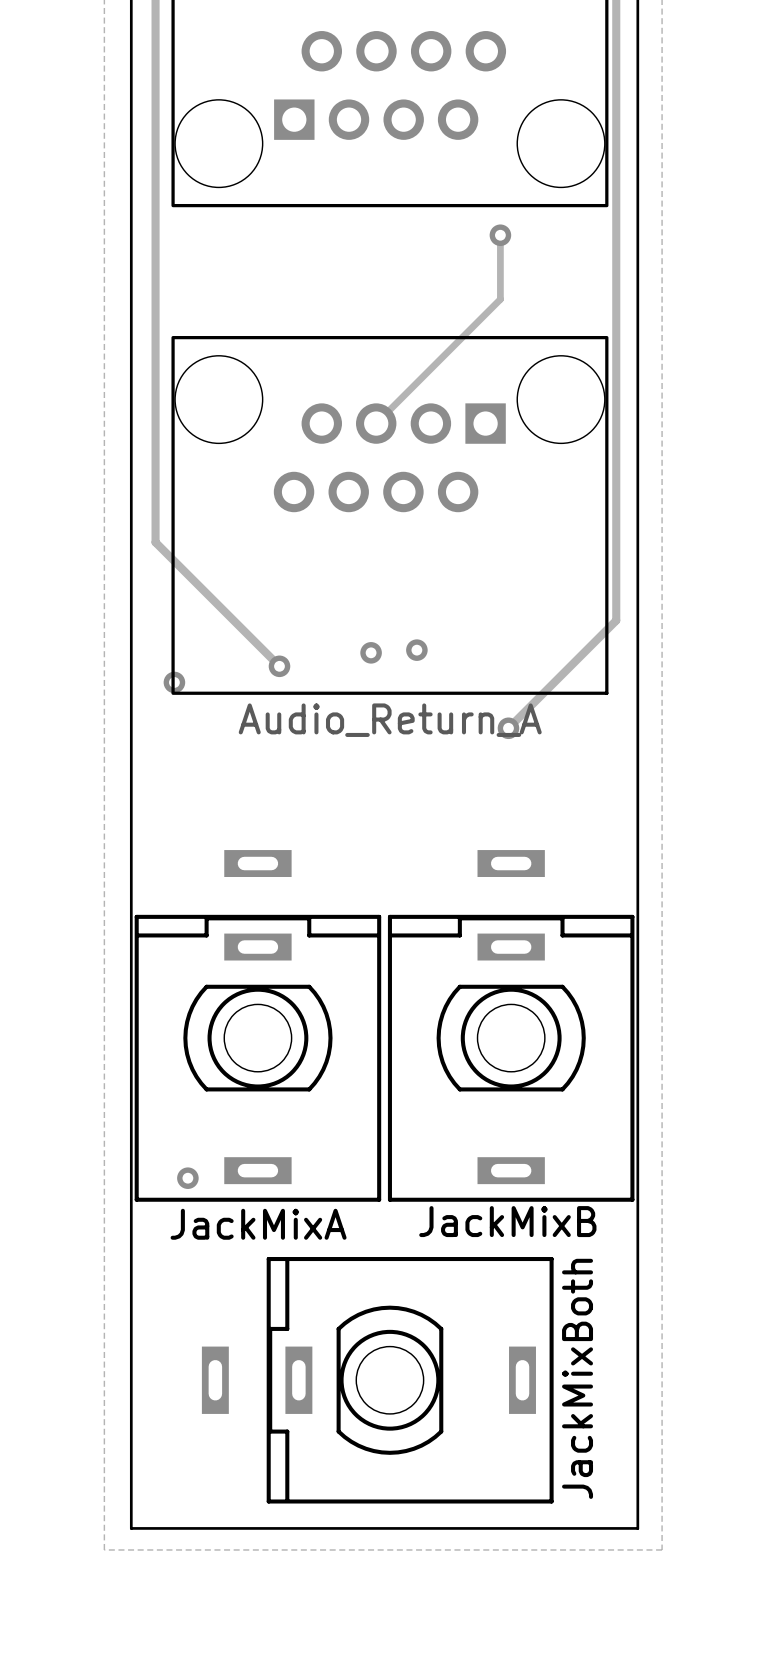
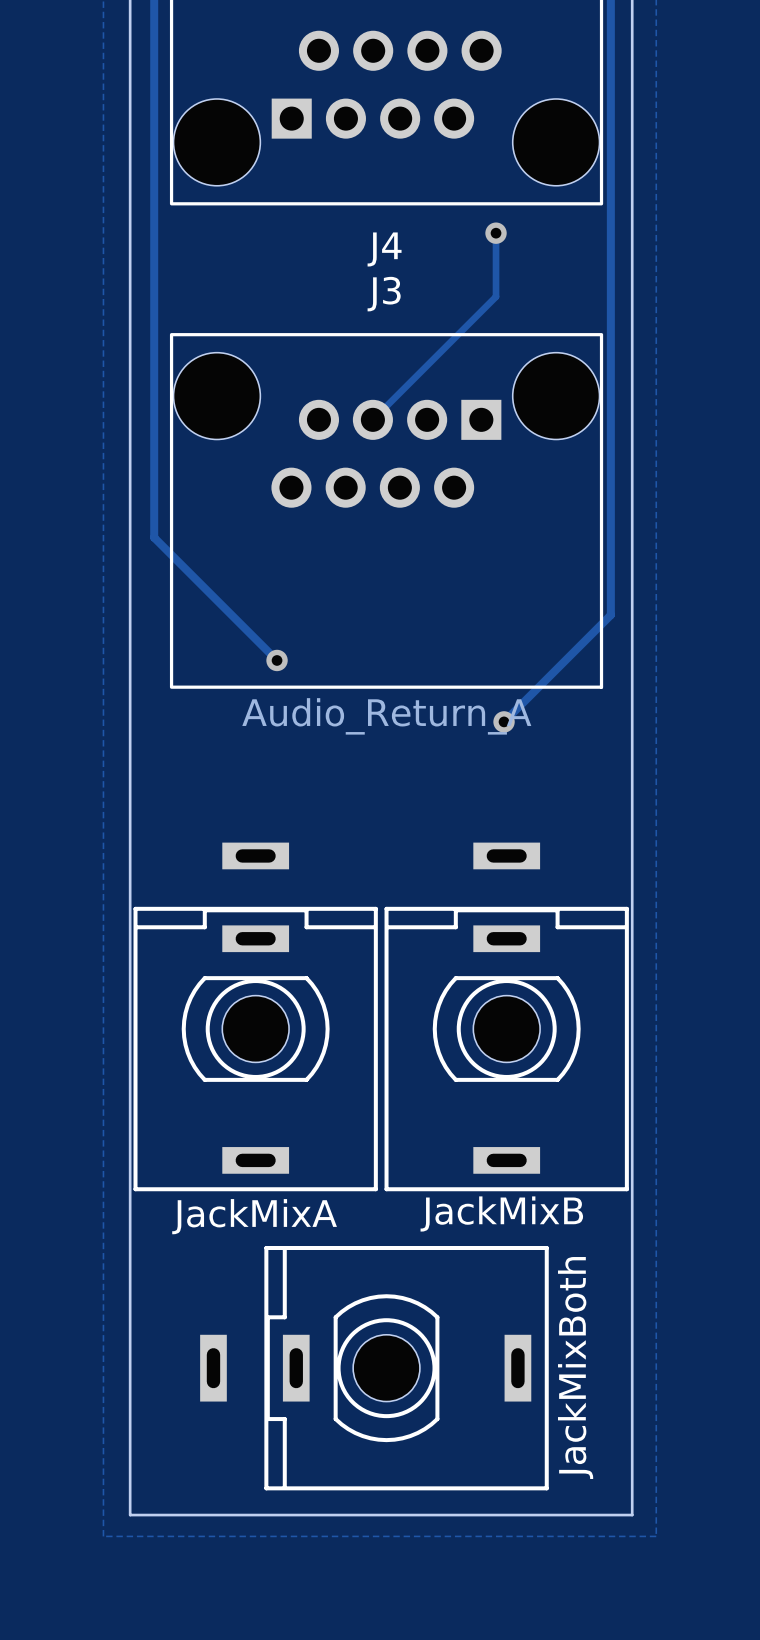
J4 name: none -> J4 (384, 249)
J3 name: none -> J3 (384, 294)
via: (416, 650) -> none
via: (371, 652) -> none
via: (174, 682) -> none
via: (187, 1178) -> none

